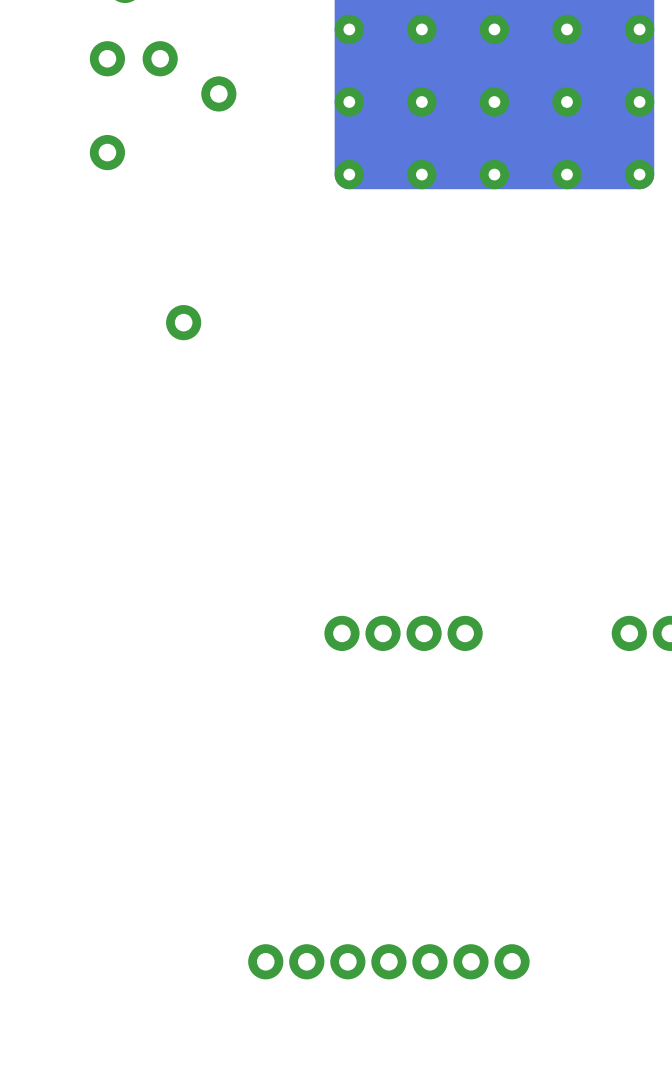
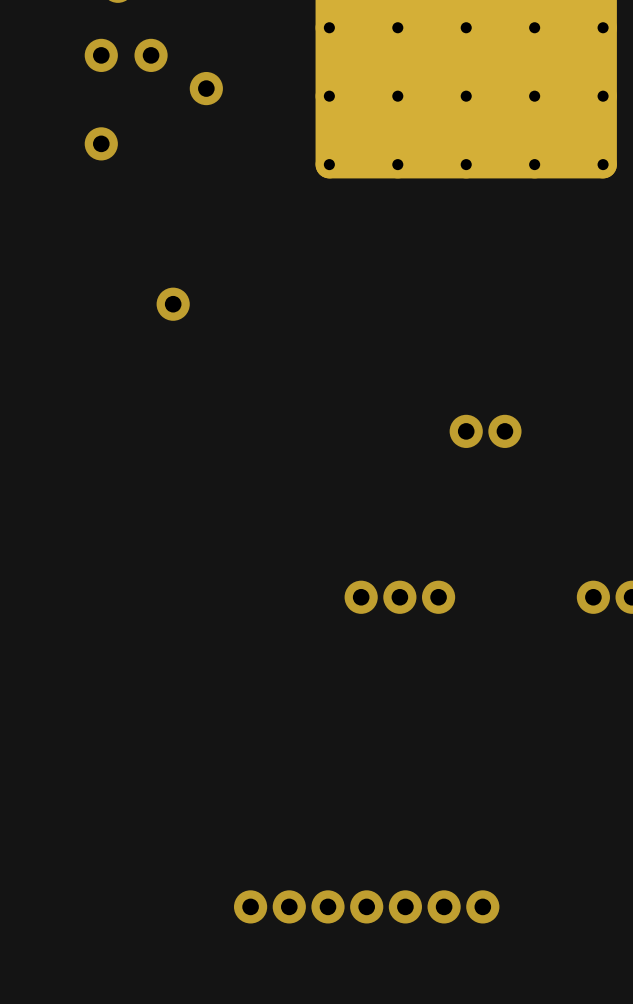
via: none -> (466, 431)
via: none -> (504, 431)
via: (341, 633) -> none

